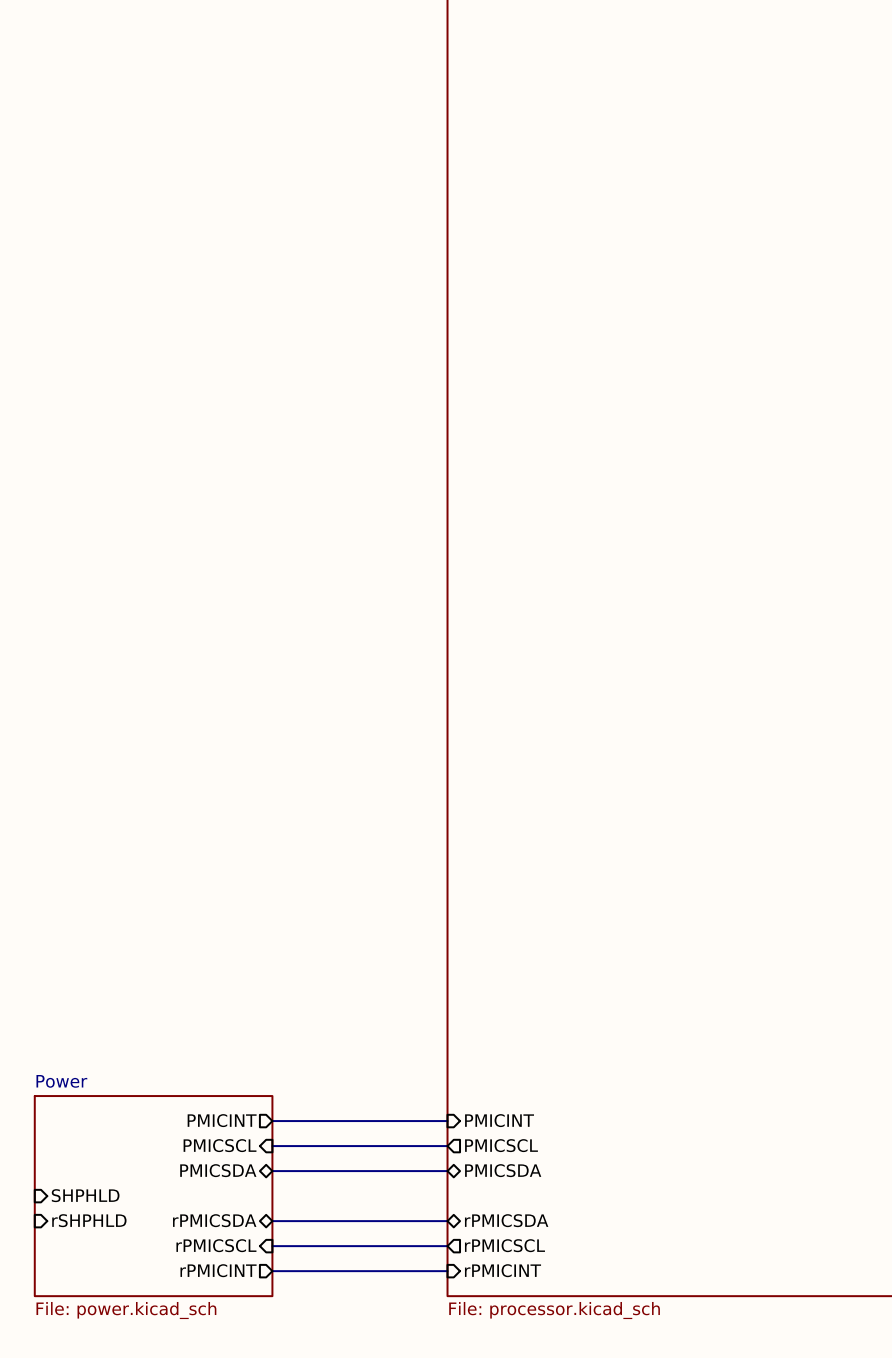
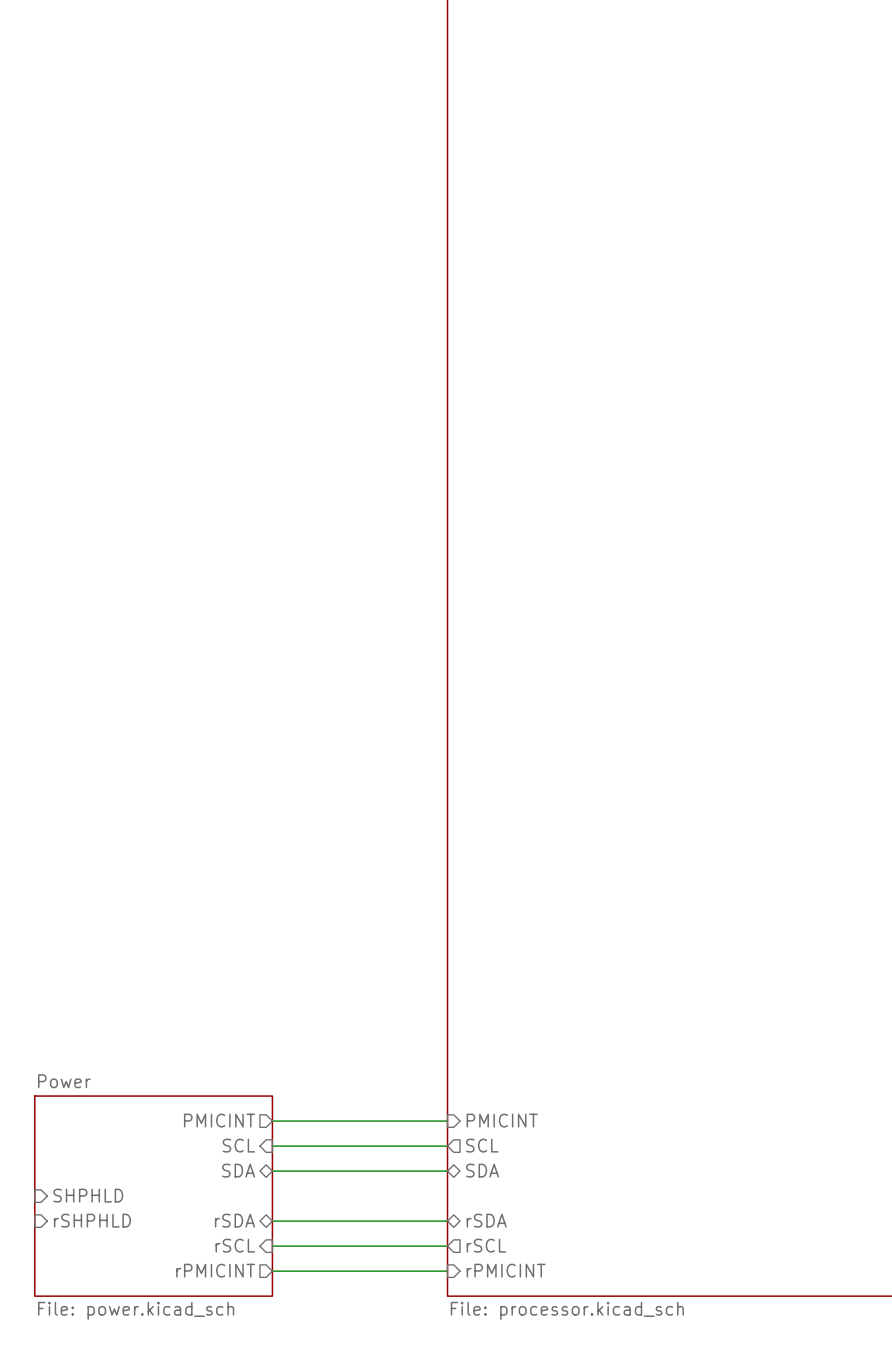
sheet pin: PMICSCL (220, 1145) -> SCL (238, 1145)
sheet pin: PMICSCL (501, 1145) -> SCL (482, 1145)
sheet pin: PMICSDA (218, 1170) -> SDA (238, 1170)
sheet pin: PMICSDA (503, 1170) -> SDA (482, 1170)
sheet pin: rPMICSDA (214, 1220) -> rSDA (235, 1220)
sheet pin: rPMICSDA (506, 1220) -> rSDA (486, 1220)
sheet pin: rPMICSCL (216, 1245) -> rSCL (235, 1245)
sheet pin: rPMICSCL (504, 1245) -> rSCL (486, 1245)

